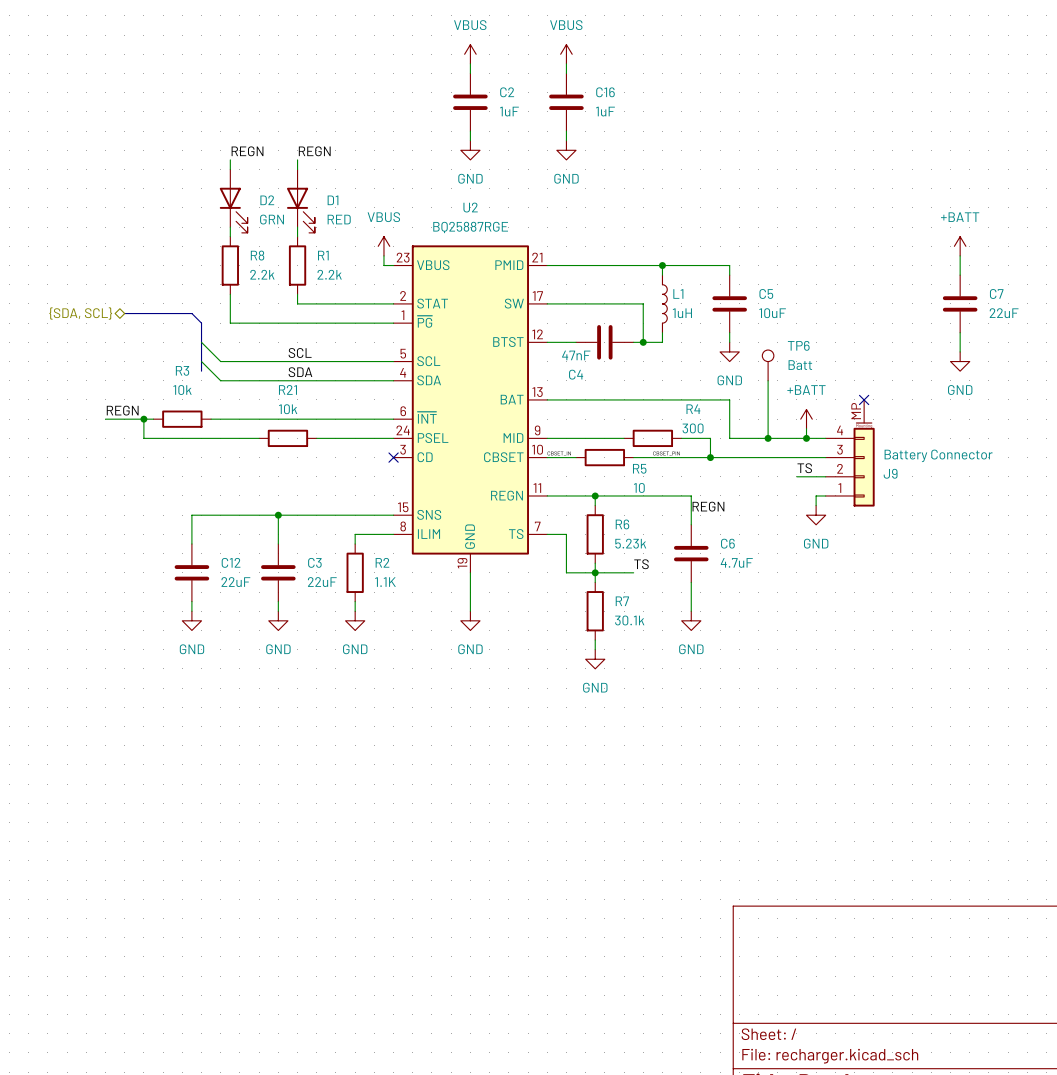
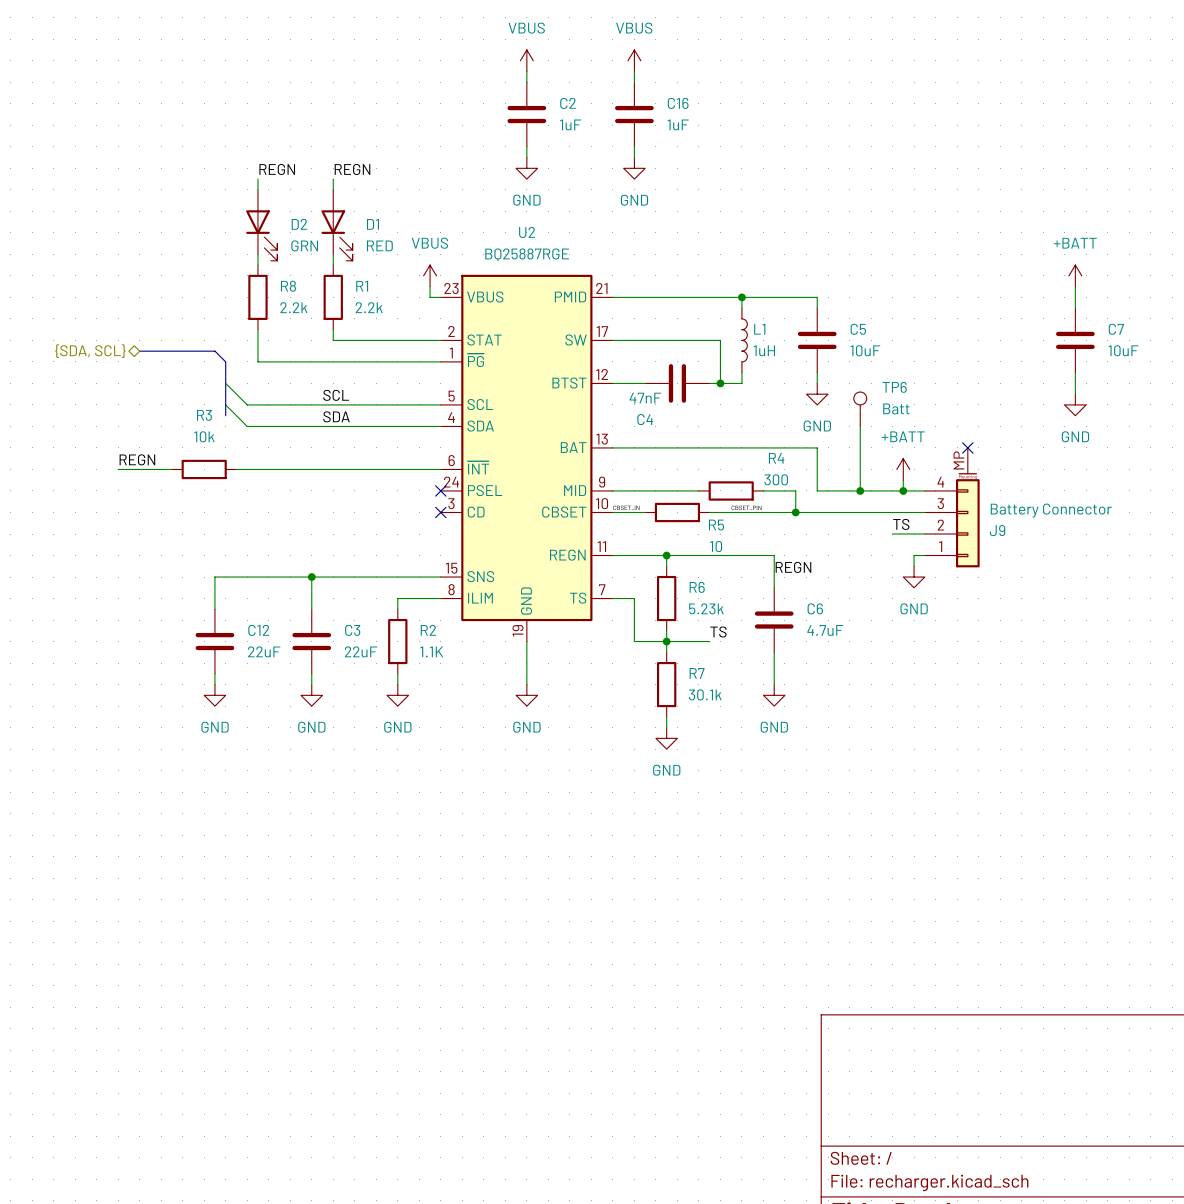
C7 value: 22uF (1004, 313) -> 10uF (1123, 350)
wire: (143, 419) (143, 438) (259, 438) -> none
junction: (143, 419) -> none
R21: 10k (287, 438) -> none
wire: (316, 438) (393, 438) -> none
no-connect mark: none -> (440, 490)

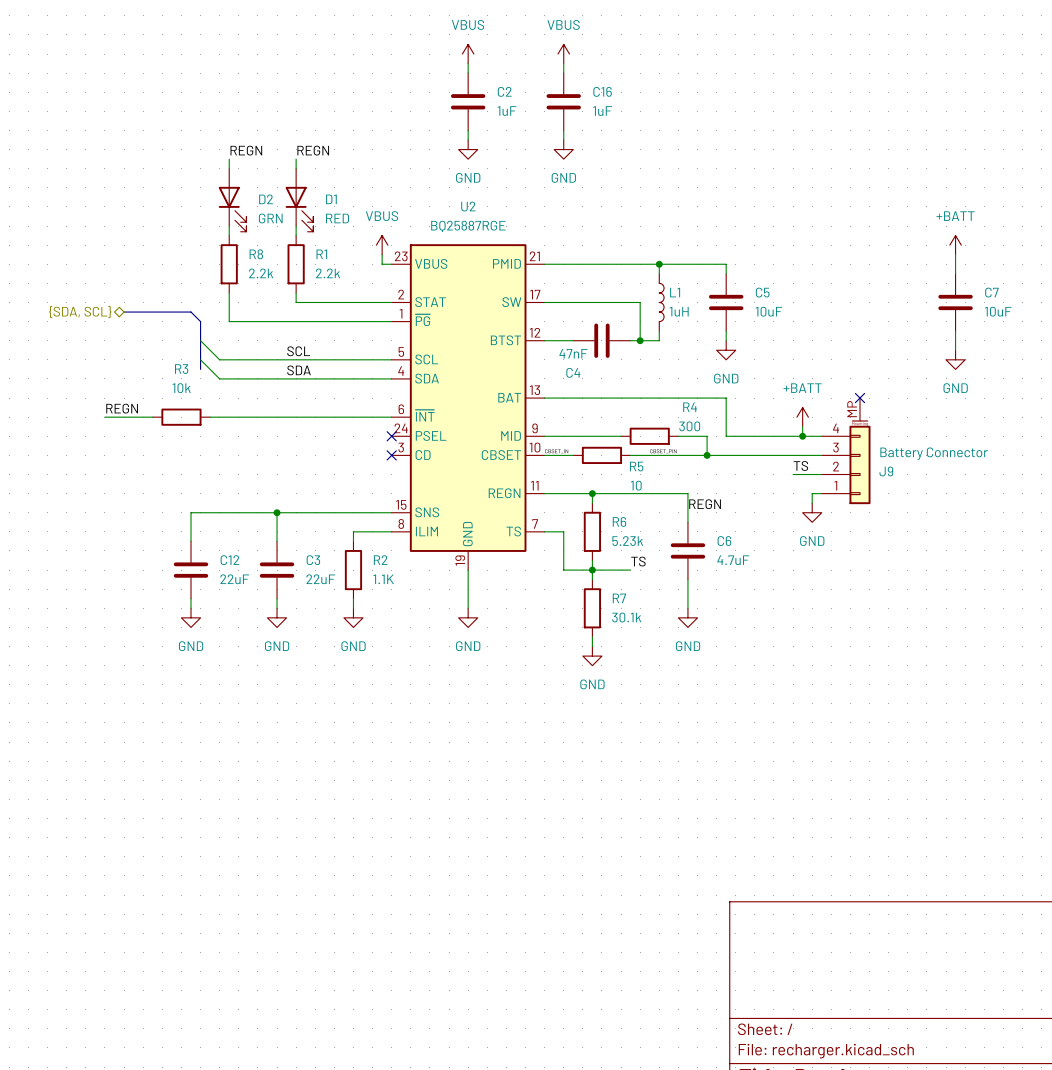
TP6: Batt (860, 409) -> none
wire: (860, 426) (860, 490) -> none
junction: (860, 490) -> none

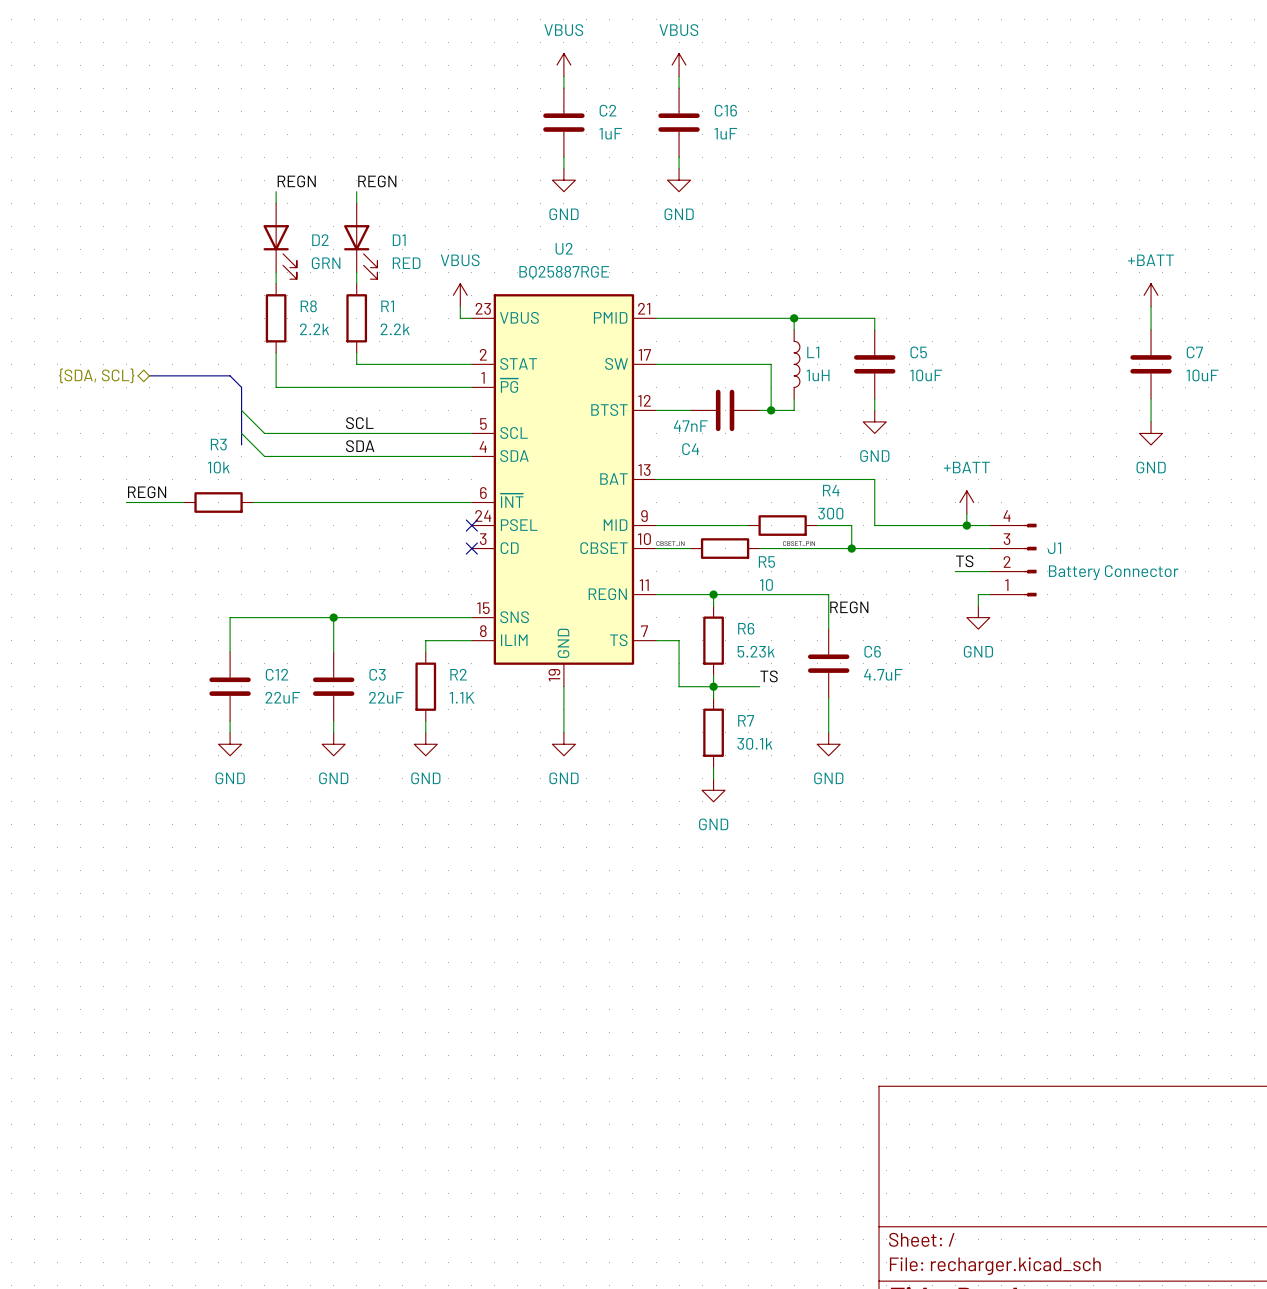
no-connect mark: (859, 398) -> none
J9: Battery Connector (846, 451) -> none
J1: none -> Battery Connector (1013, 560)

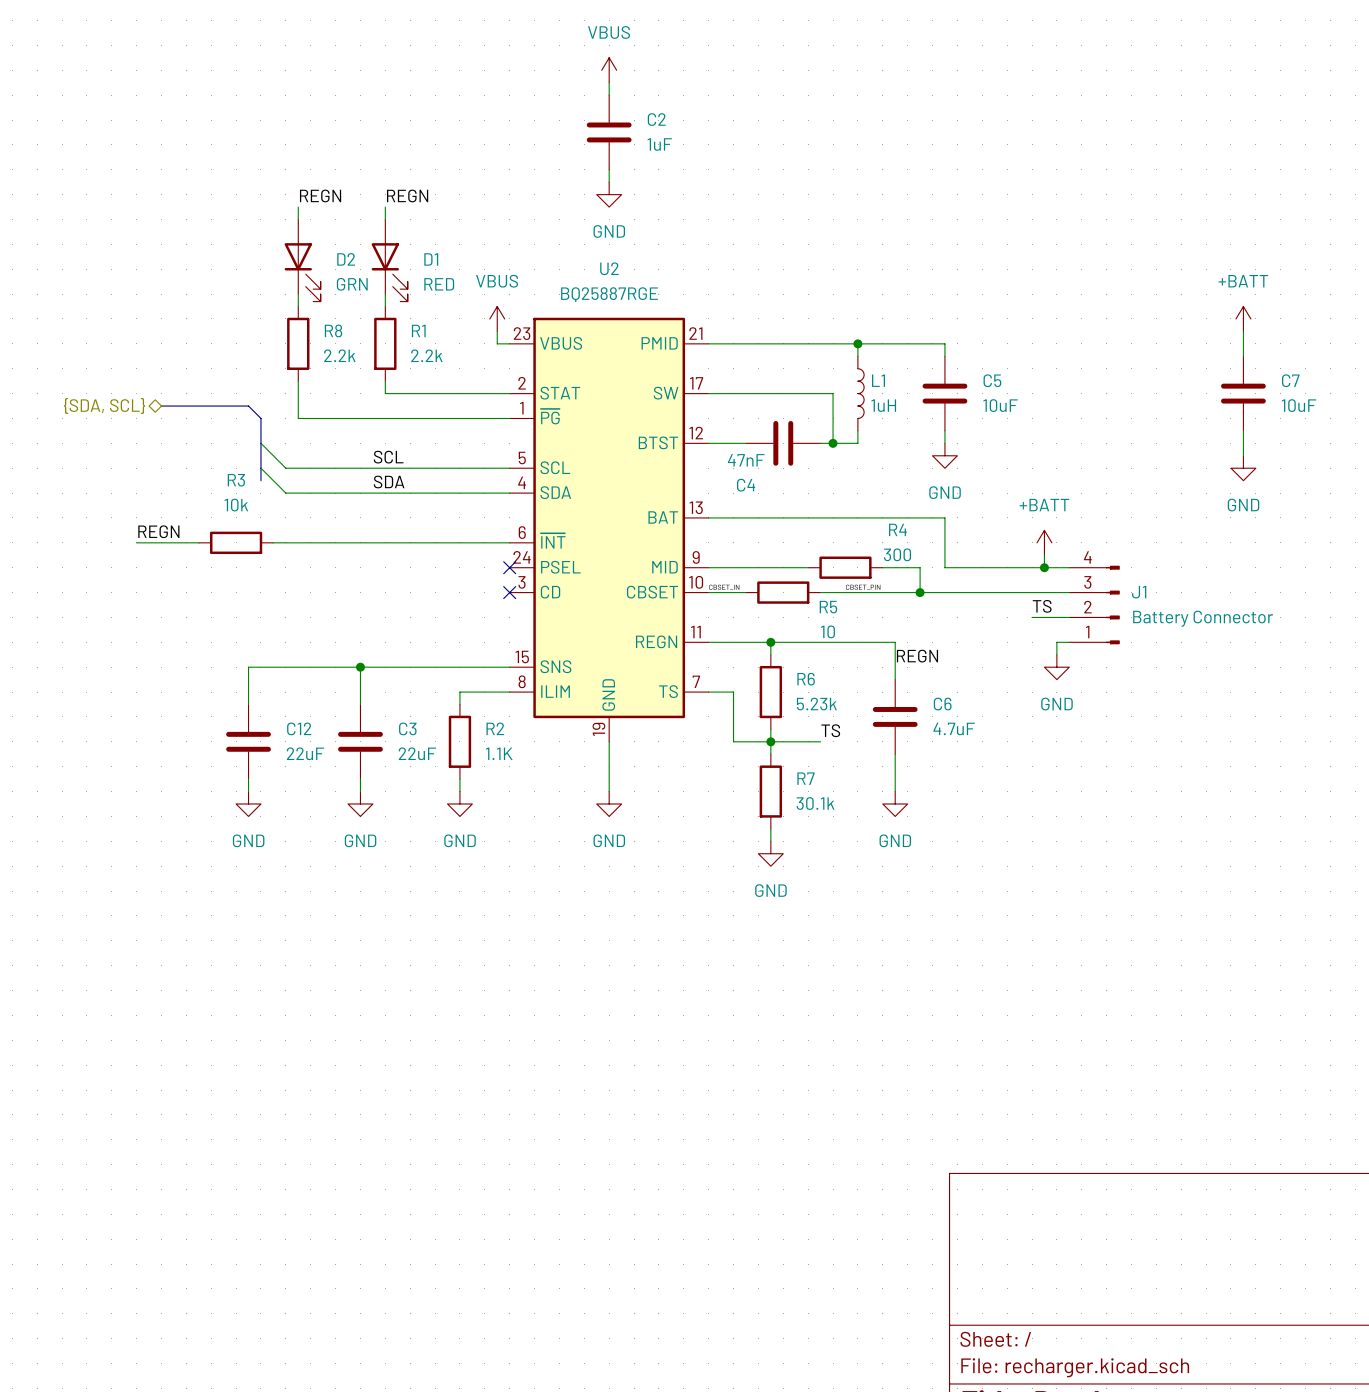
power symbol: VBUS (679, 65) -> none
wire: (679, 76) (679, 88) -> none
C16: 1uF (679, 122) -> none
wire: (679, 157) (679, 168) -> none
power symbol: GND (679, 180) -> none

